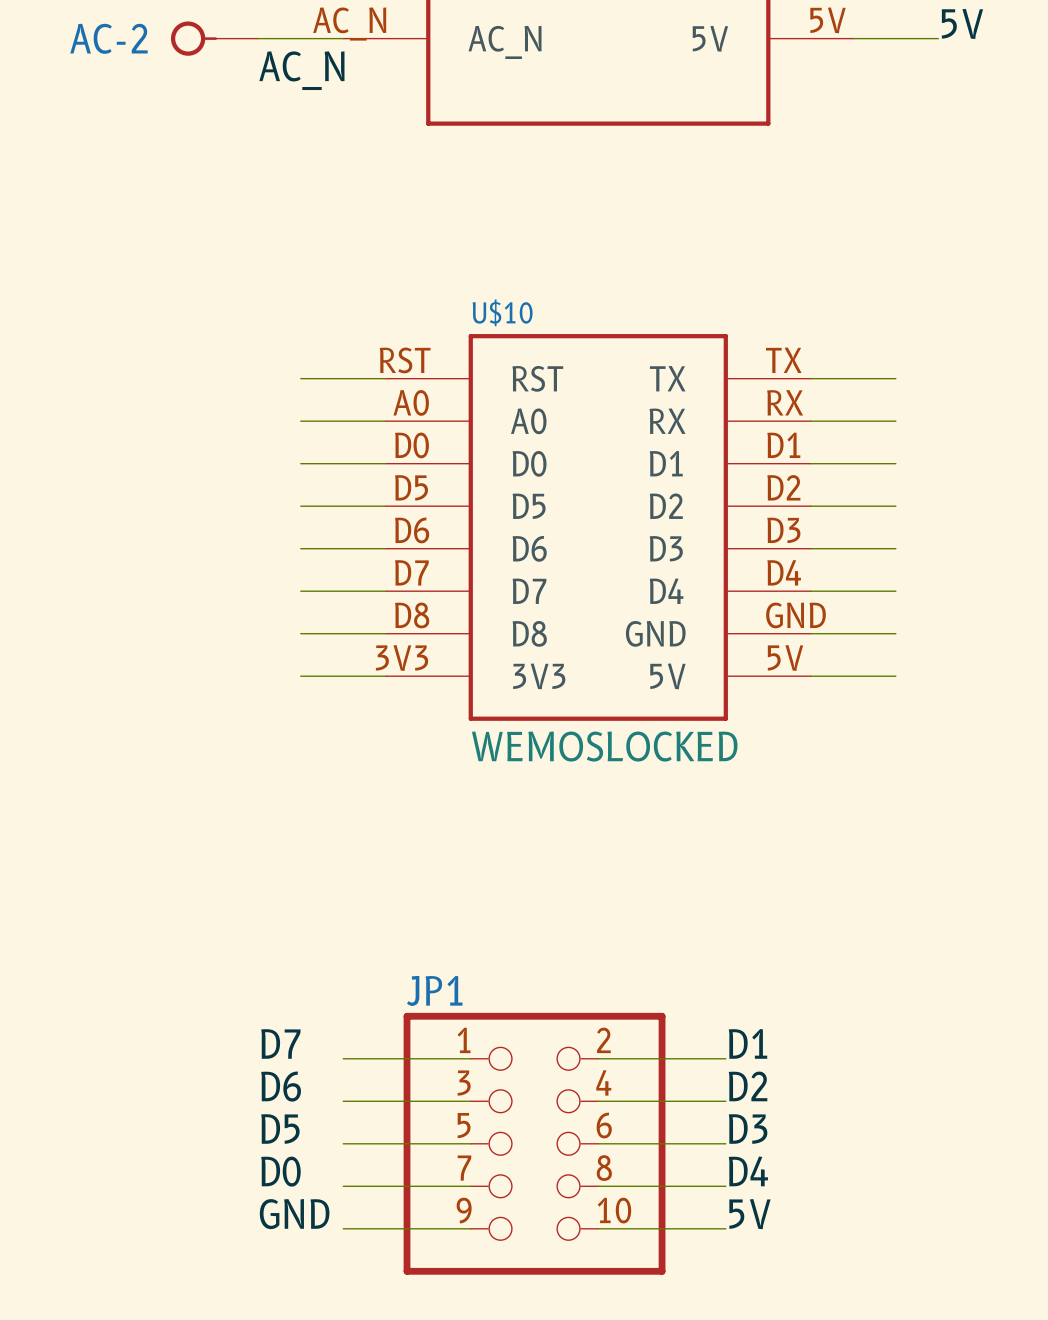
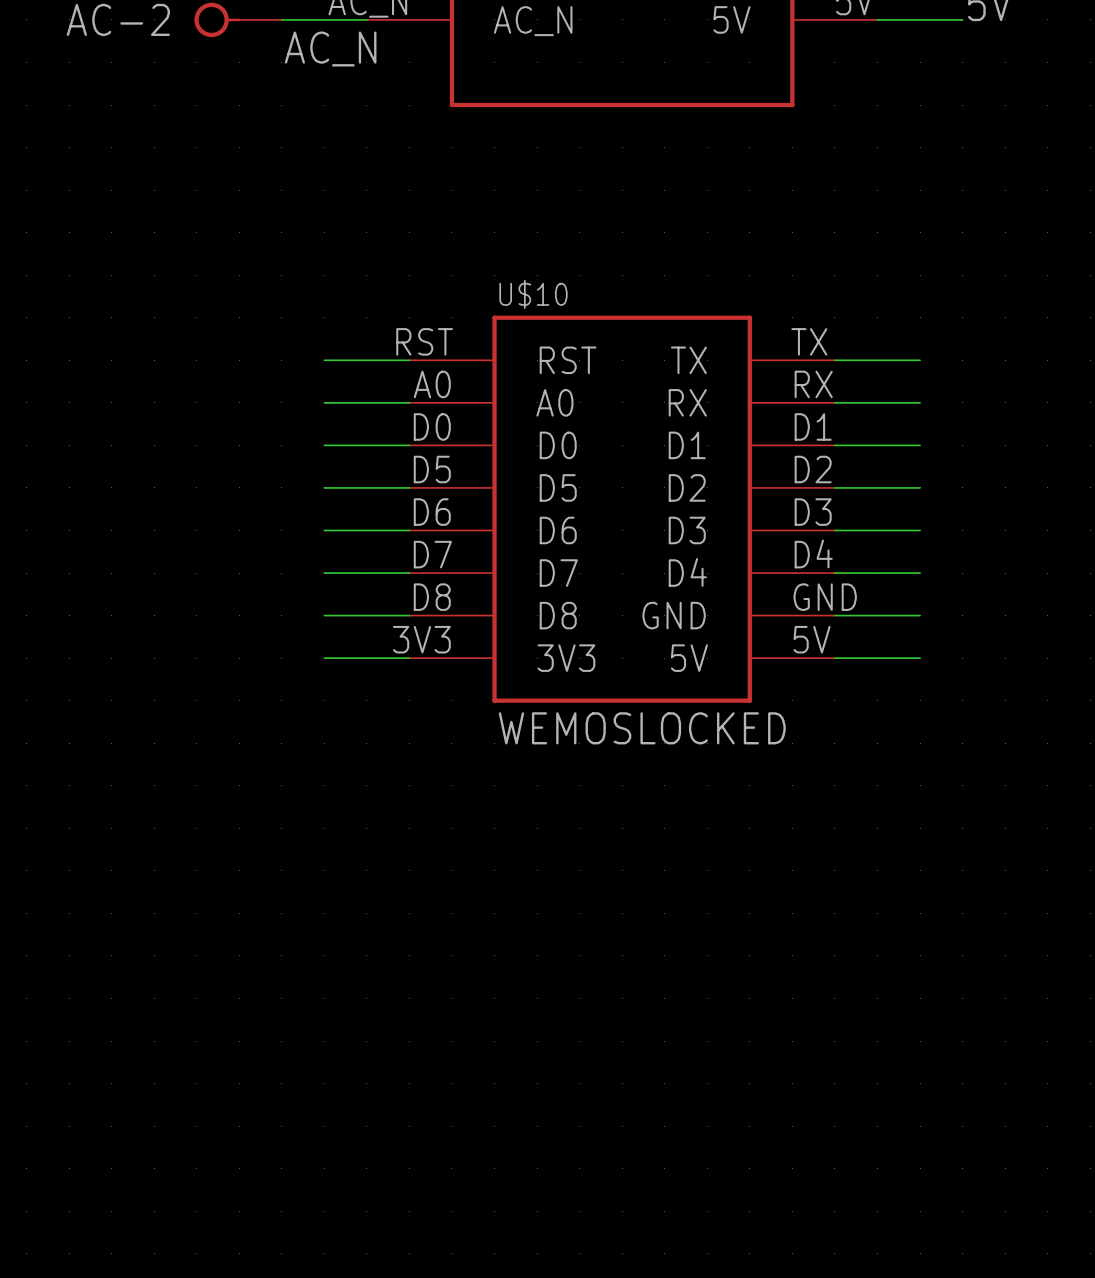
label: D7 (280, 1043) -> none
label: D1 (748, 1043) -> none
wire: (343, 1058) (470, 1058) -> none
wire: (598, 1058) (725, 1058) -> none
label: D6 (281, 1086) -> none
label: D2 (748, 1086) -> none
wire: (343, 1101) (470, 1101) -> none
wire: (598, 1101) (725, 1101) -> none
label: D5 (280, 1129) -> none
label: D3 (748, 1129) -> none
wire: (343, 1143) (470, 1143) -> none
JP1: (534, 1143) -> none
wire: (598, 1143) (725, 1143) -> none
label: D0 (280, 1171) -> none
label: D4 (748, 1171) -> none
wire: (343, 1186) (470, 1186) -> none
wire: (598, 1186) (725, 1186) -> none
label: GND (294, 1214) -> none
label: 5V (749, 1214) -> none
wire: (343, 1228) (470, 1228) -> none
wire: (598, 1228) (725, 1228) -> none

